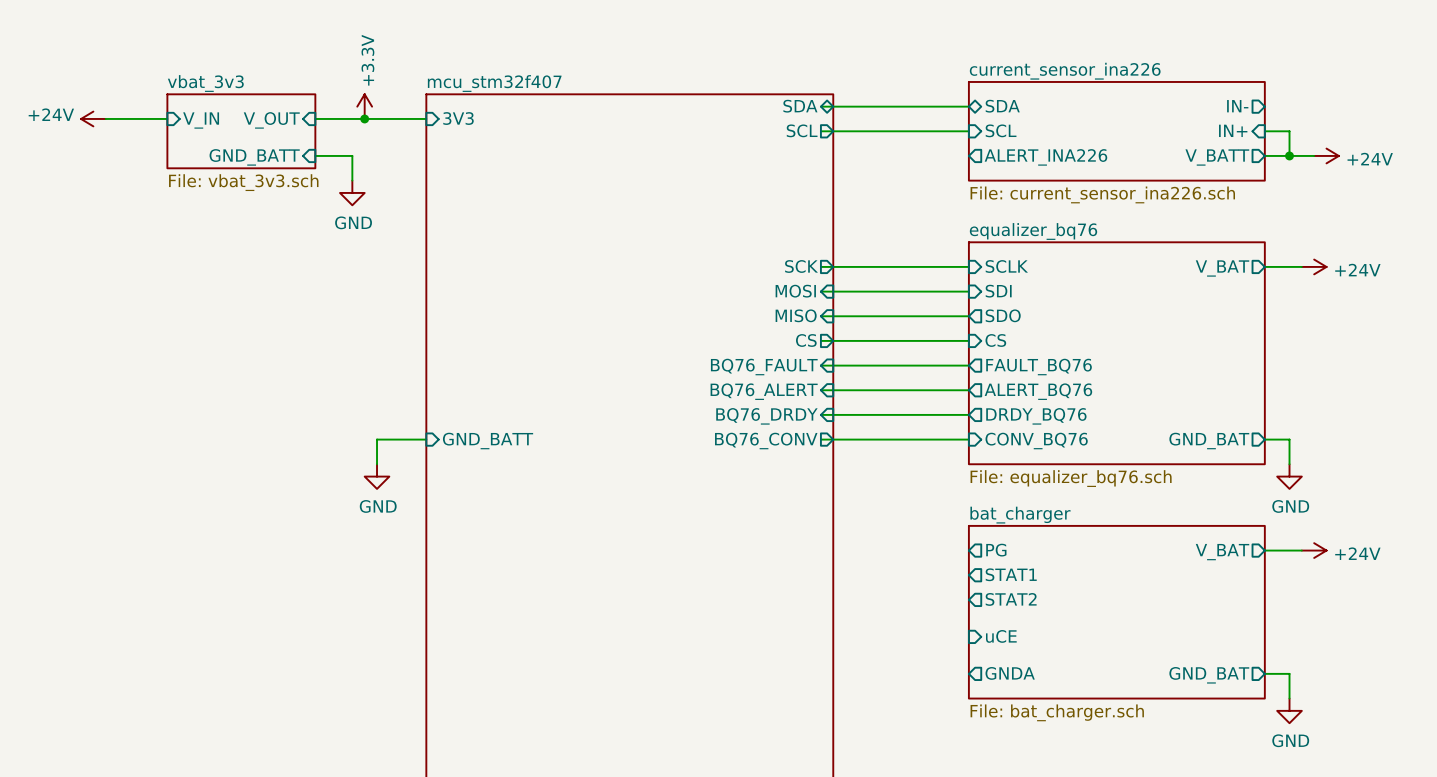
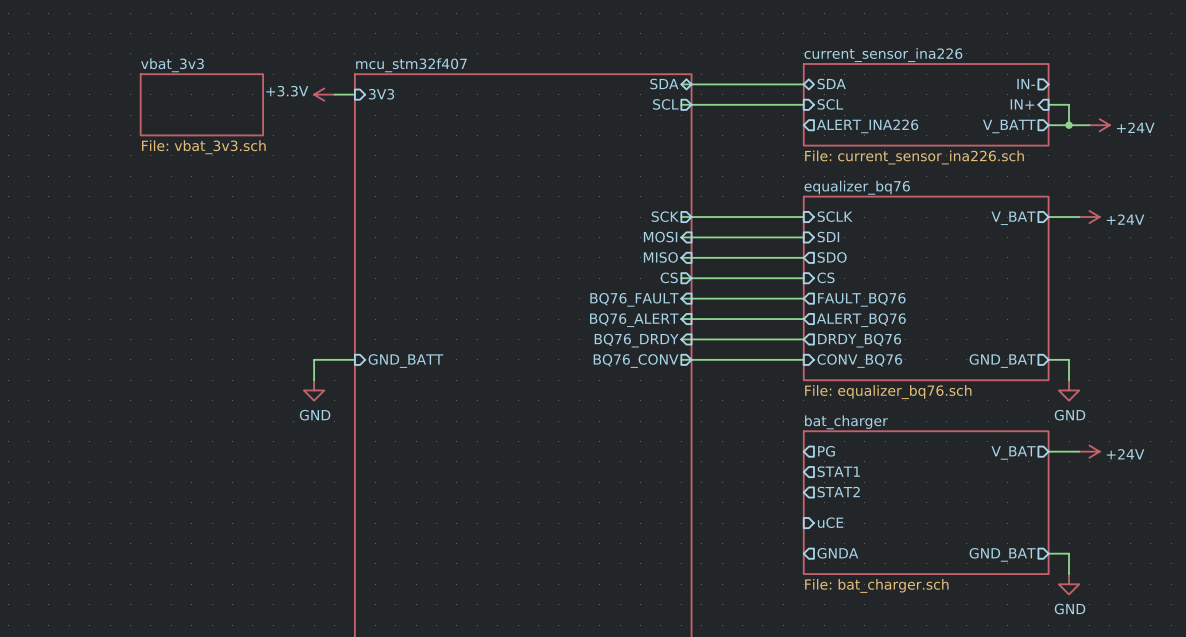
power symbol rotation: 0° (364, 106) -> 90° counterclockwise (324, 94)
power symbol position: +3.3V (364, 106) -> +3.3V (324, 94)
power symbol: +24V (93, 118) -> none
wire: (105, 118) (167, 118) -> none
wire: (315, 118) (401, 118) -> none
junction: (364, 118) -> none
sheet pin: V_IN (201, 120) -> none
sheet pin: V_OUT (271, 120) -> none
wire: (315, 155) (352, 155) (352, 180) -> none
sheet pin: GND_BATT (254, 157) -> none
power symbol: GND (352, 192) -> none

